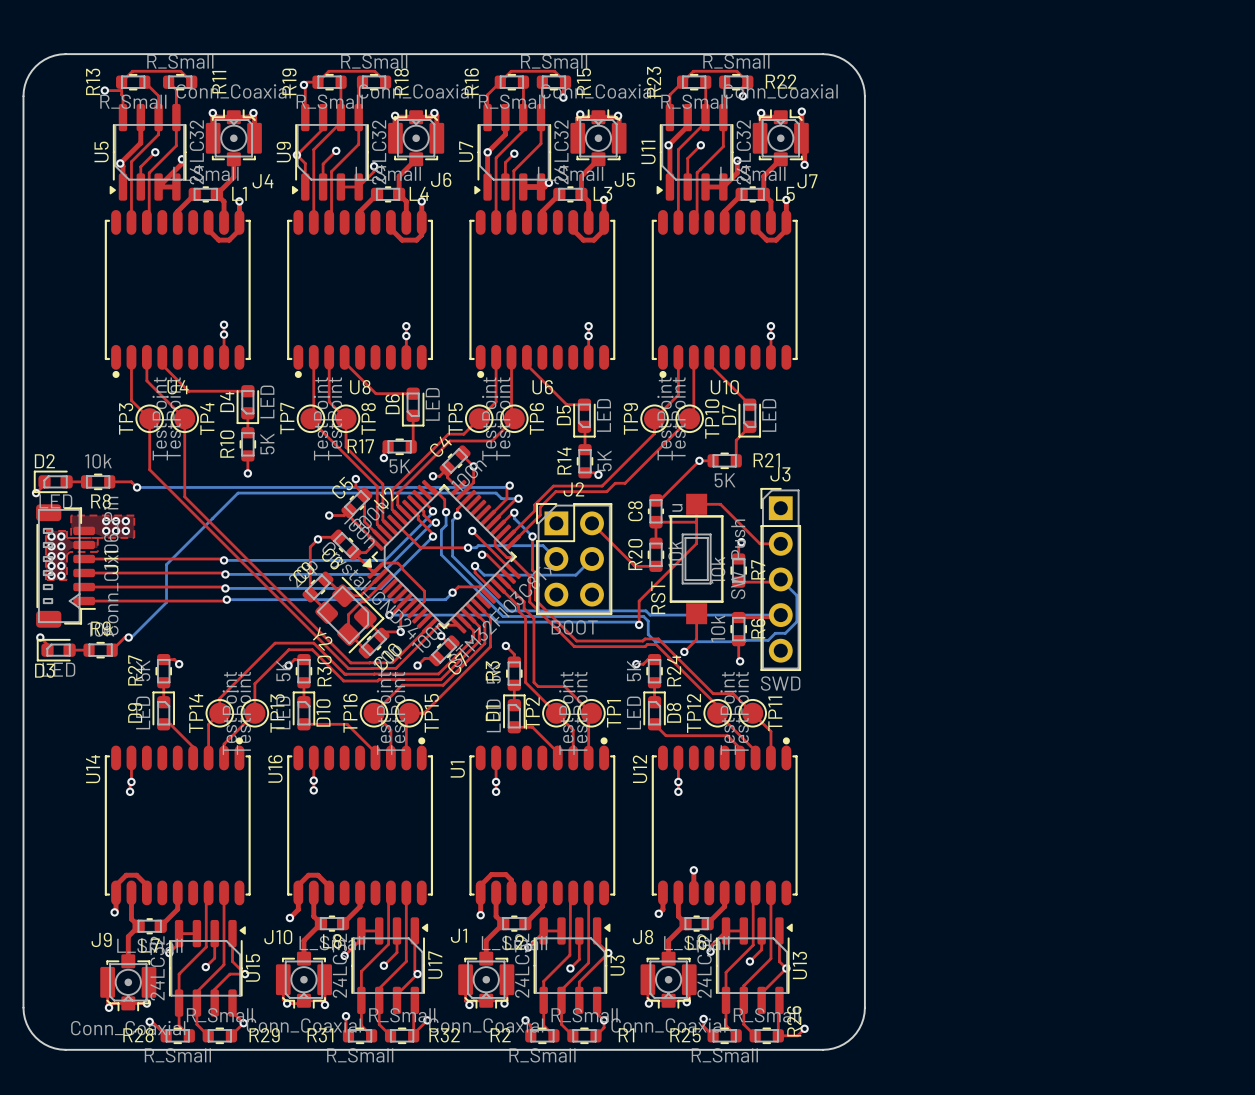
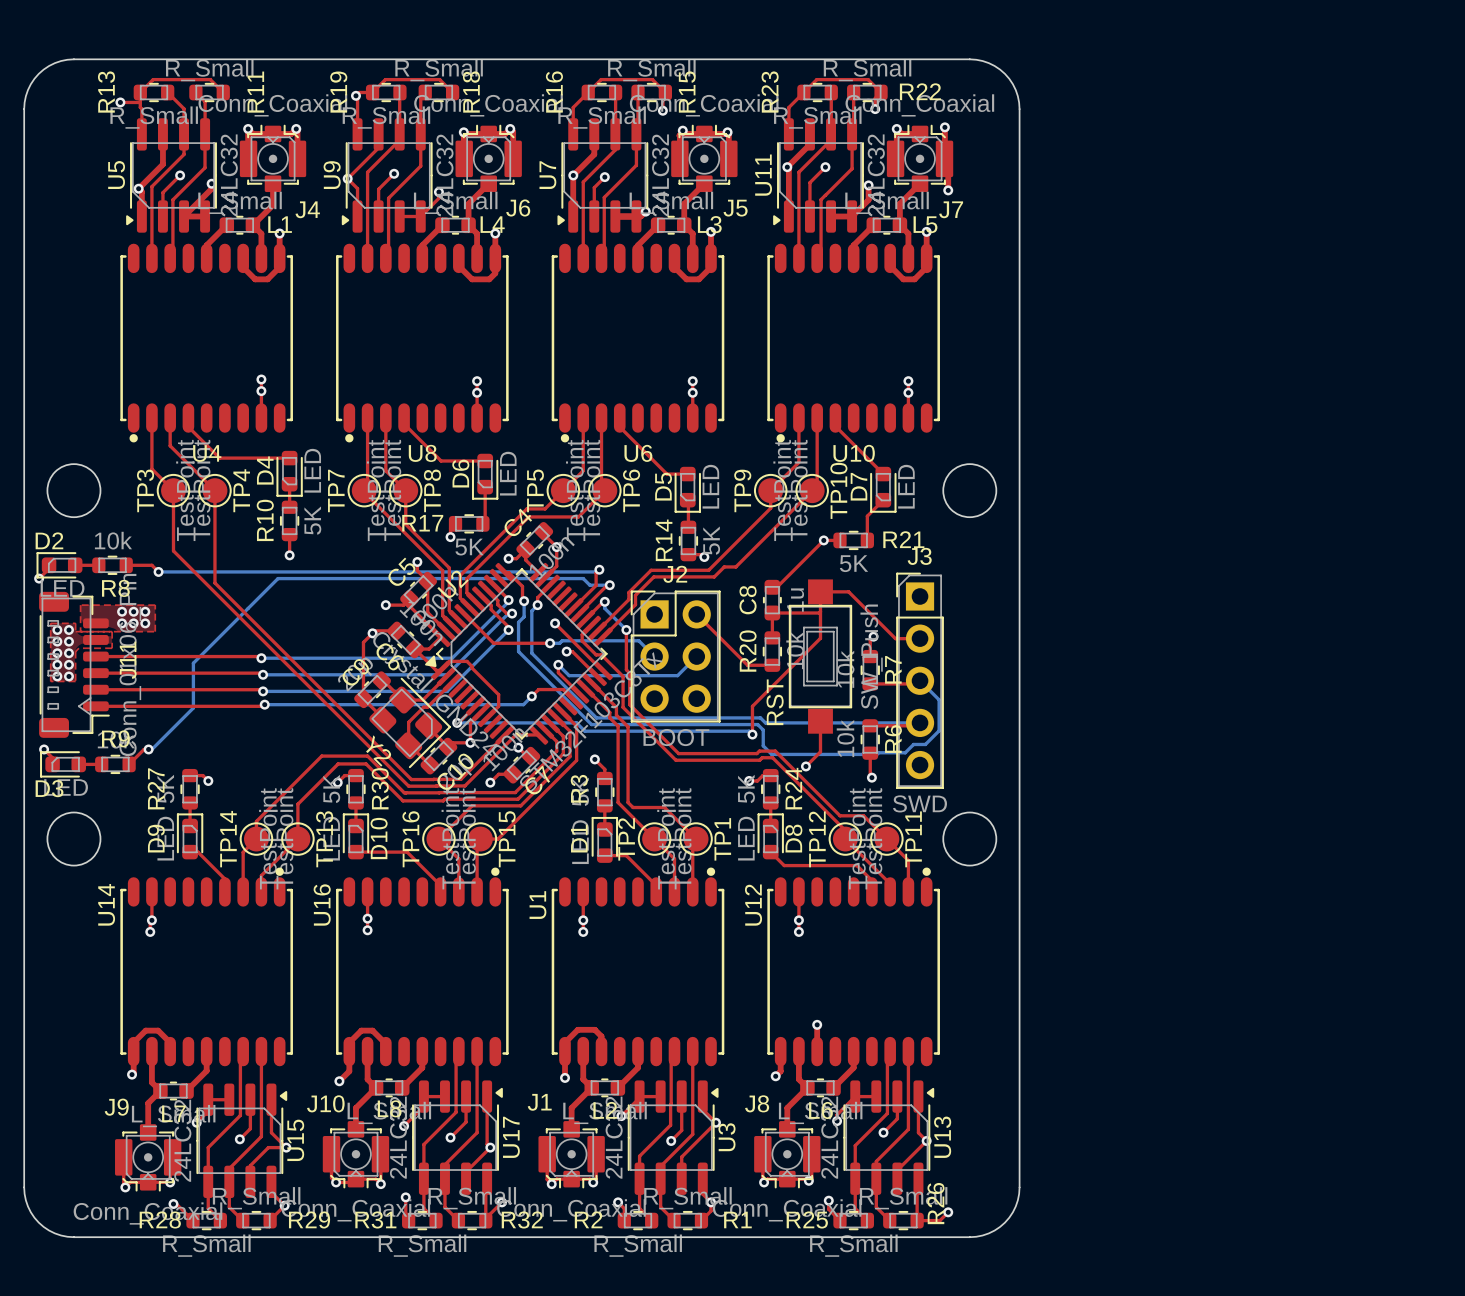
round board edge: none -> [46, 463, 102, 519]
round board edge: none -> [942, 463, 998, 519]
round board edge: none -> [46, 811, 102, 867]
round board edge: none -> [942, 811, 998, 867]

